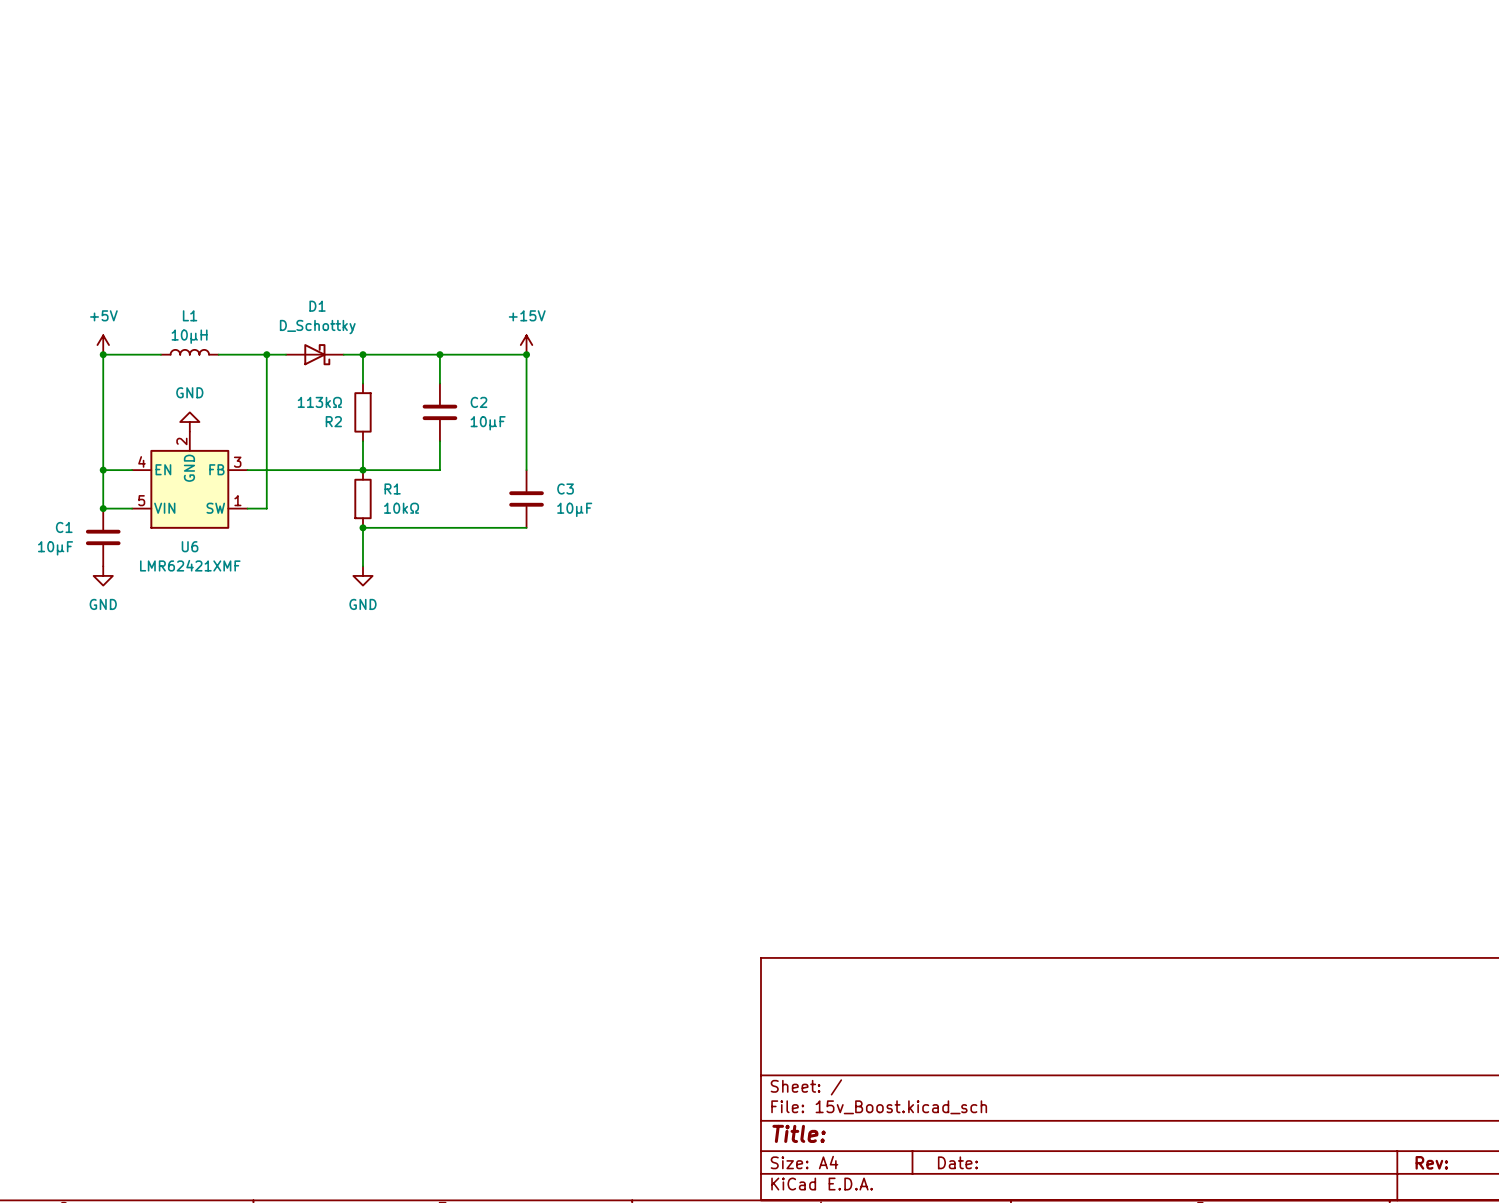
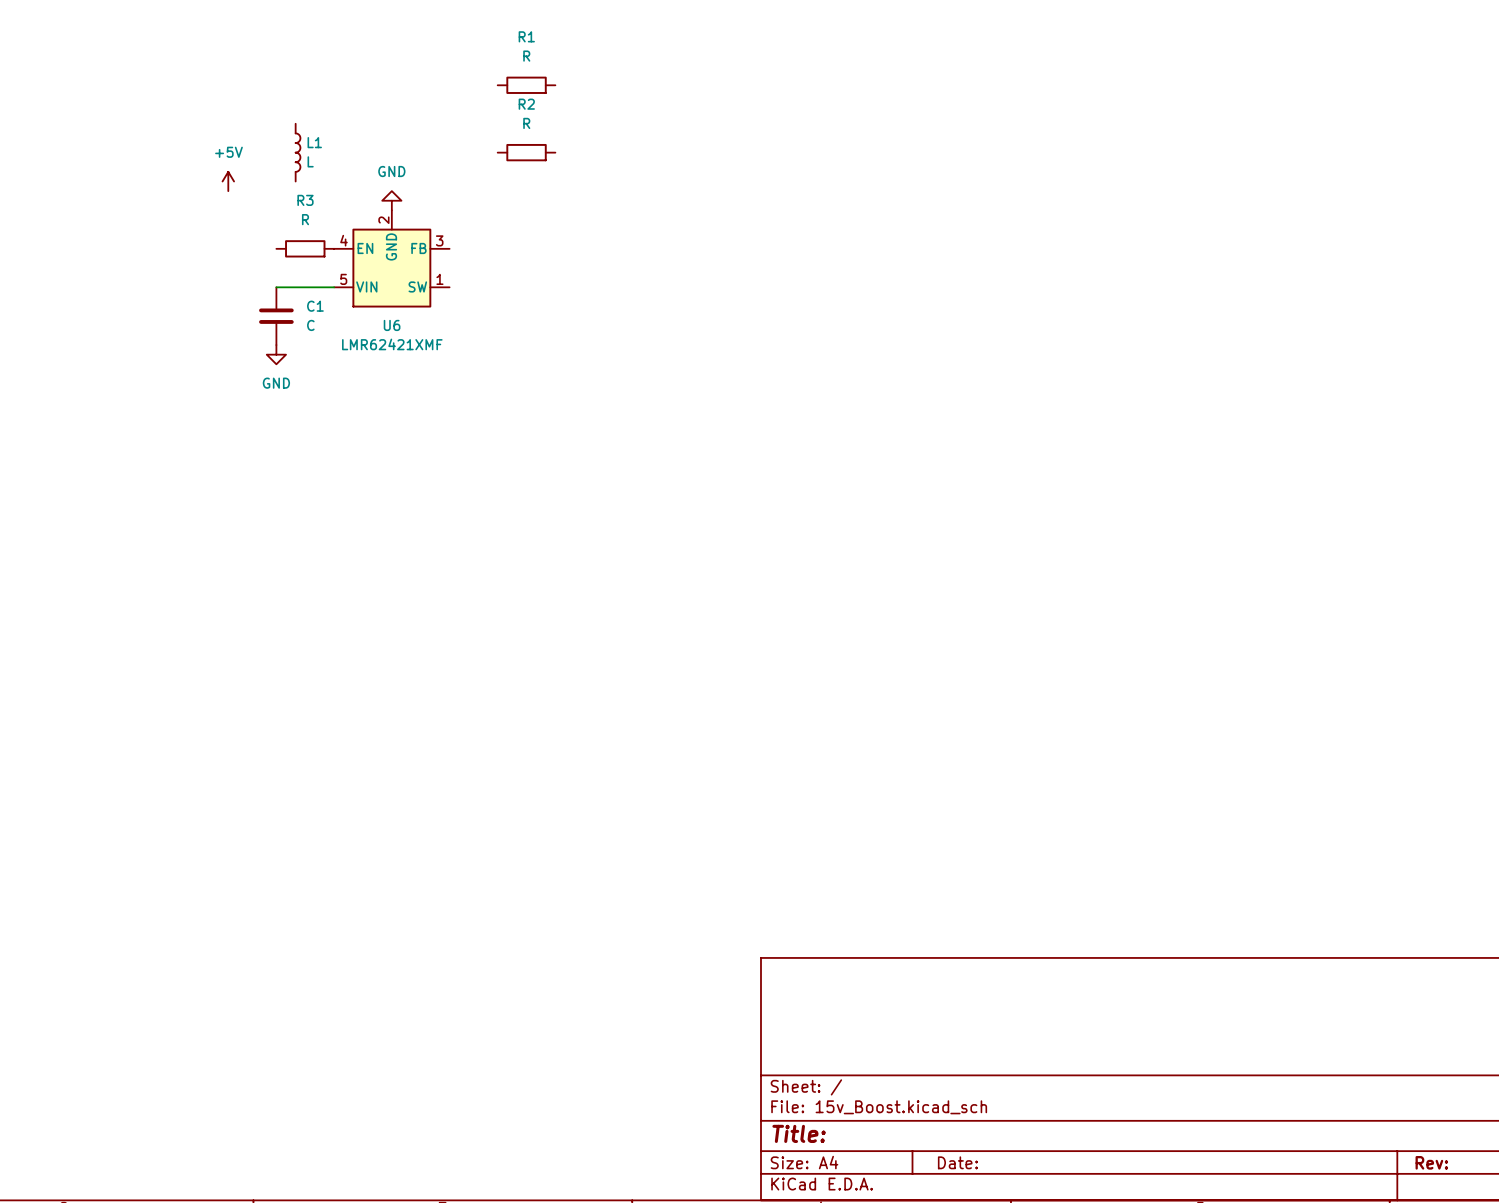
power symbol: none -> +5V (228, 181)
power symbol: none -> GND (391, 200)
R3: none -> R (305, 248)
wire: none -> (276, 287) (334, 287)
L1 name position: L1 (190, 315) -> L1 (314, 142)
L1 value: 10µH (189, 336) -> L (310, 161)
power symbol: +5V (103, 345) -> none
power symbol: +15V (526, 345) -> none
L1 rotation: 0° (189, 352) -> 90° clockwise (298, 152)
L1 position: (189, 352) -> (298, 152)
junction: (103, 354) -> none
wire: (160, 354) (103, 354) (103, 508) (132, 508) -> none
wire: (218, 354) (286, 354) -> none
wire: (266, 354) (266, 508) (247, 508) -> none
junction: (266, 354) -> none
D1: D_Schottky (314, 354) -> none
wire: (343, 354) (526, 354) (526, 470) -> none
wire: (362, 354) (362, 383) -> none
junction: (362, 354) -> none
wire: (439, 354) (439, 383) -> none
junction: (439, 354) -> none
junction: (526, 354) -> none
R2 value: 113kΩ (319, 402) -> R (526, 123)
R2 rotation: 0° (362, 412) -> 90° clockwise (526, 152)
R2 position: (362, 412) -> (526, 152)
C2: 10µF (439, 412) -> none
R2 name position: R2 (333, 421) -> R2 (526, 104)
power symbol rotation: 0° (189, 422) -> 180° (276, 354)
power symbol position: GND (189, 422) -> GND (276, 354)
wire: (362, 441) (362, 470) -> none
wire: (439, 441) (439, 470) (247, 470) -> none
wire: (103, 470) (132, 470) -> none
junction: (103, 470) -> none
junction: (362, 470) -> none
U6 position: (189, 480) -> (391, 258)
R1 name position: R1 (392, 488) -> R1 (526, 36)
R1 rotation: 0° (362, 498) -> 90° clockwise (526, 85)
R1 position: (362, 498) -> (526, 85)
C3: 10µF (526, 498) -> none
junction: (103, 508) -> none
R1 value: 10kΩ (401, 508) -> R (526, 56)
C1 name position: C1 (64, 527) -> C1 (315, 306)
junction: (362, 527) -> none
wire: (526, 527) (362, 527) (362, 566) -> none
C1 position: (103, 537) -> (276, 316)
C1 value: 10µF (55, 548) -> C (310, 325)
power symbol: GND (103, 575) -> none
power symbol: GND (362, 575) -> none

